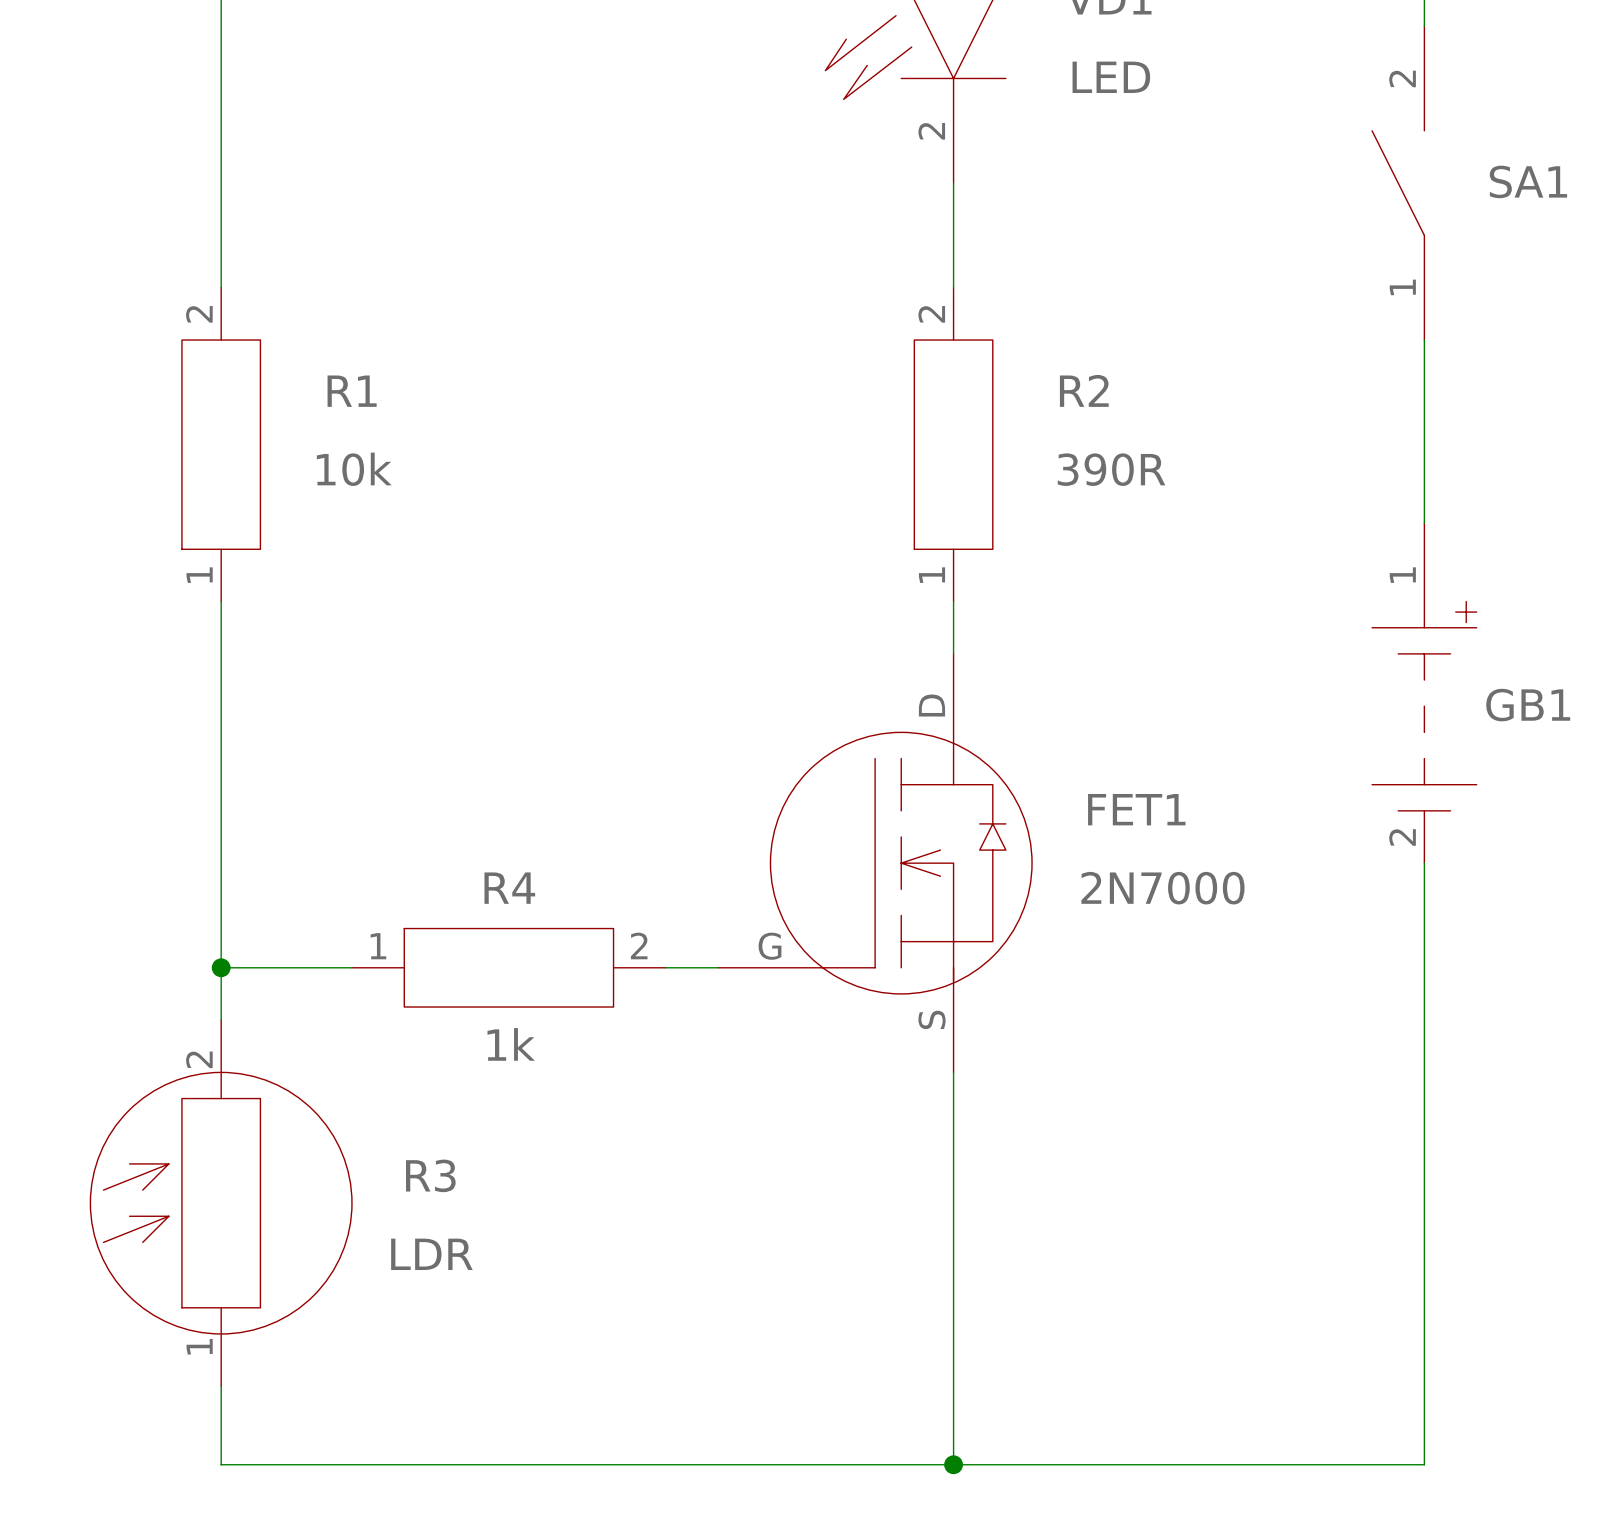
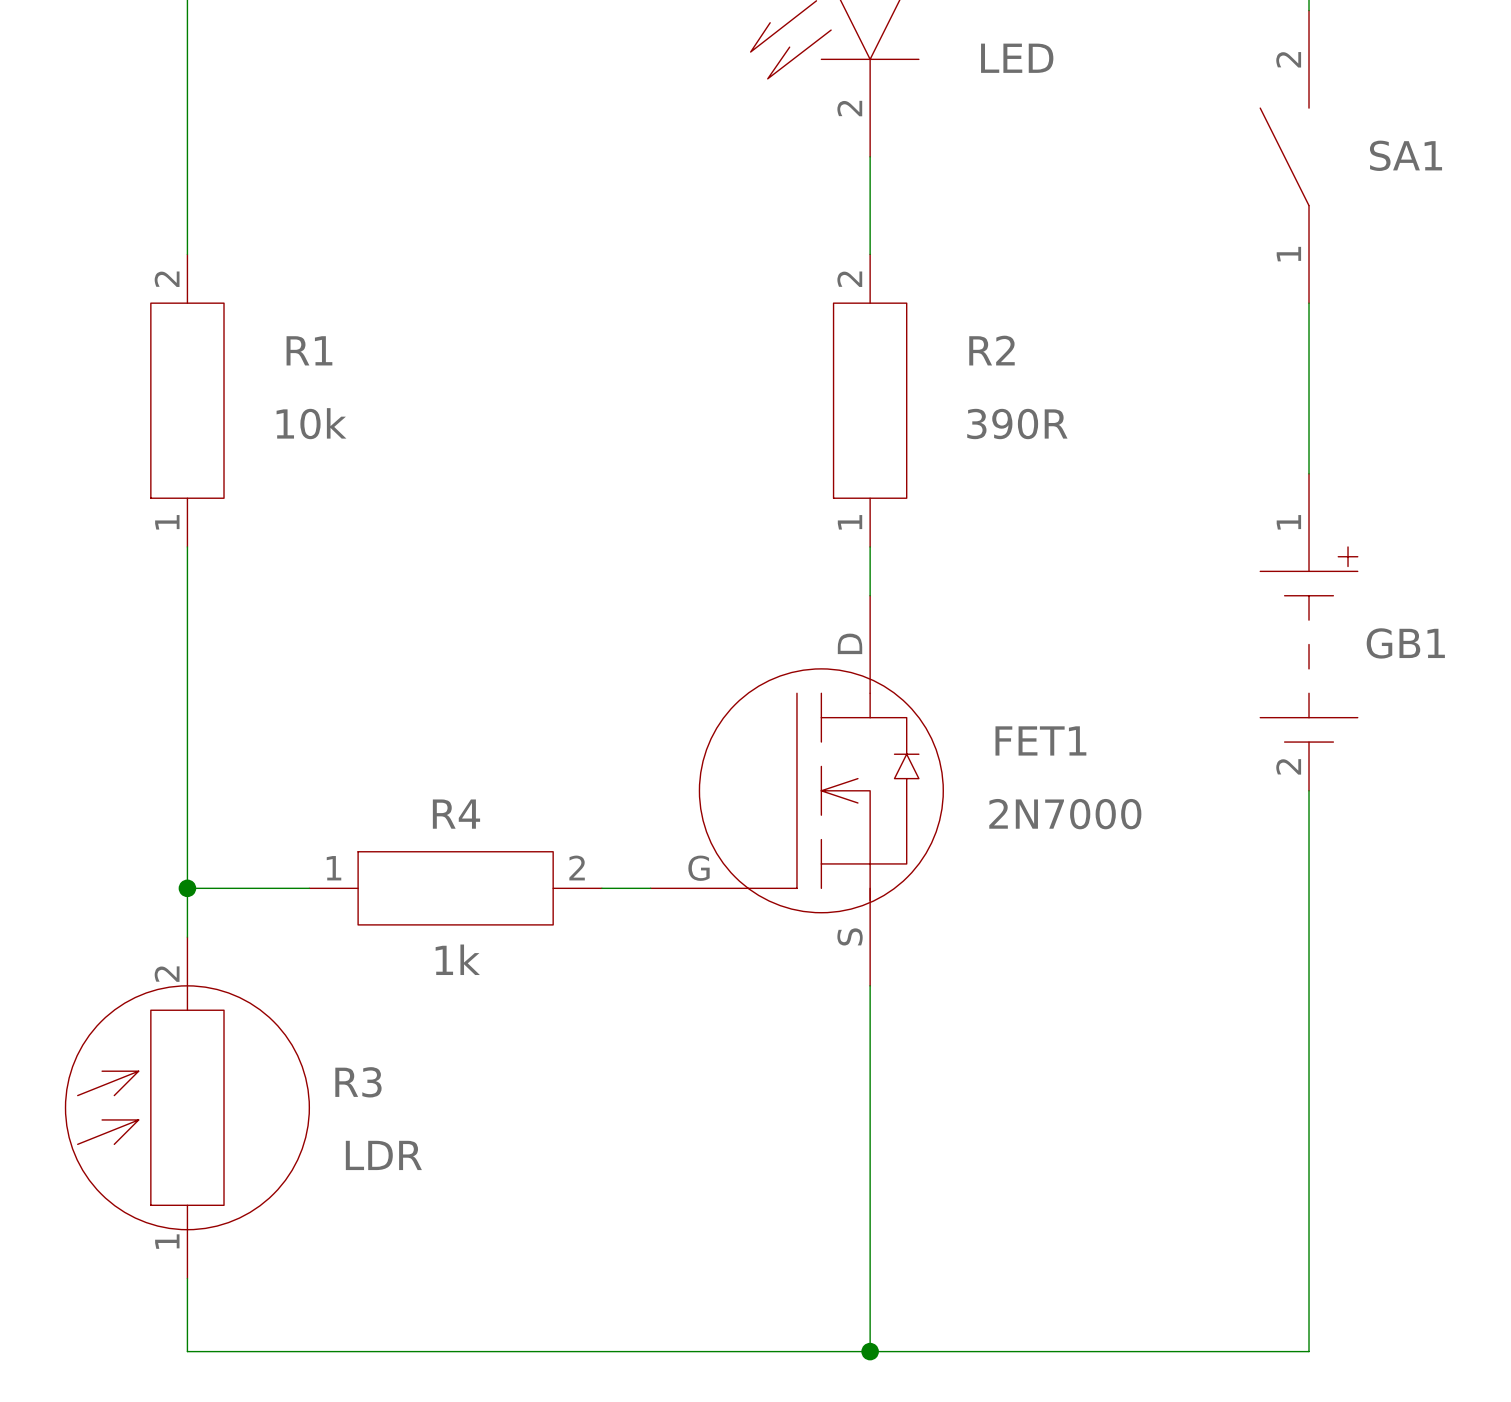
R3 name position: R3 (430, 1175) -> R3 (358, 1082)

